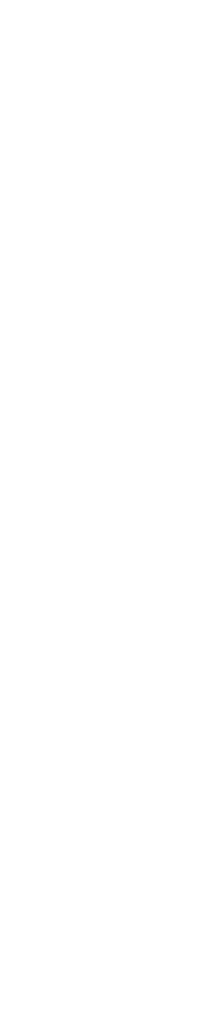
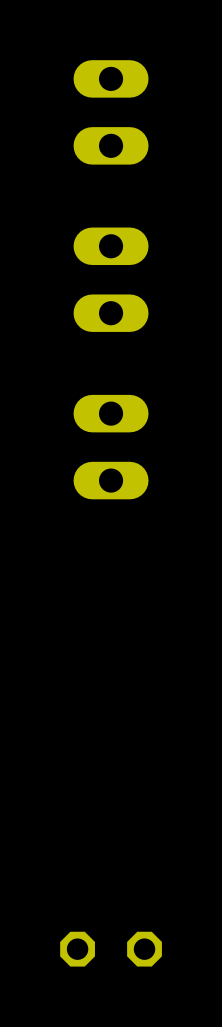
part: none -> (111, 112)
part: none -> (111, 279)
part: none -> (111, 447)
part: none -> (111, 949)

